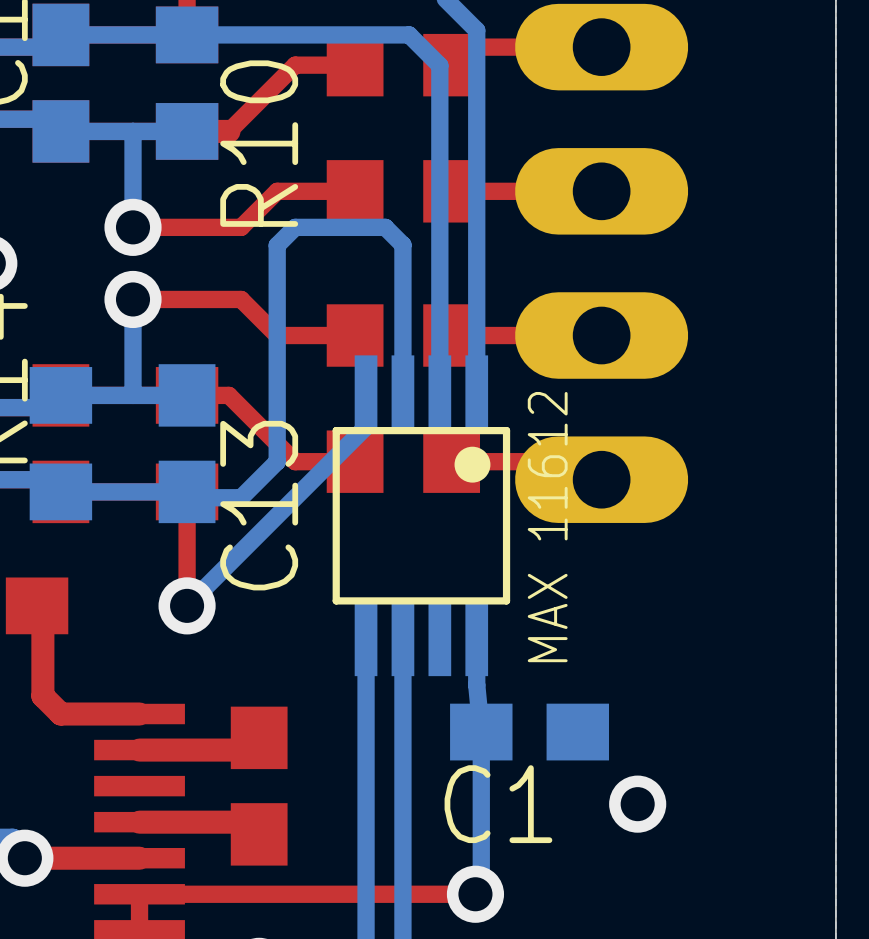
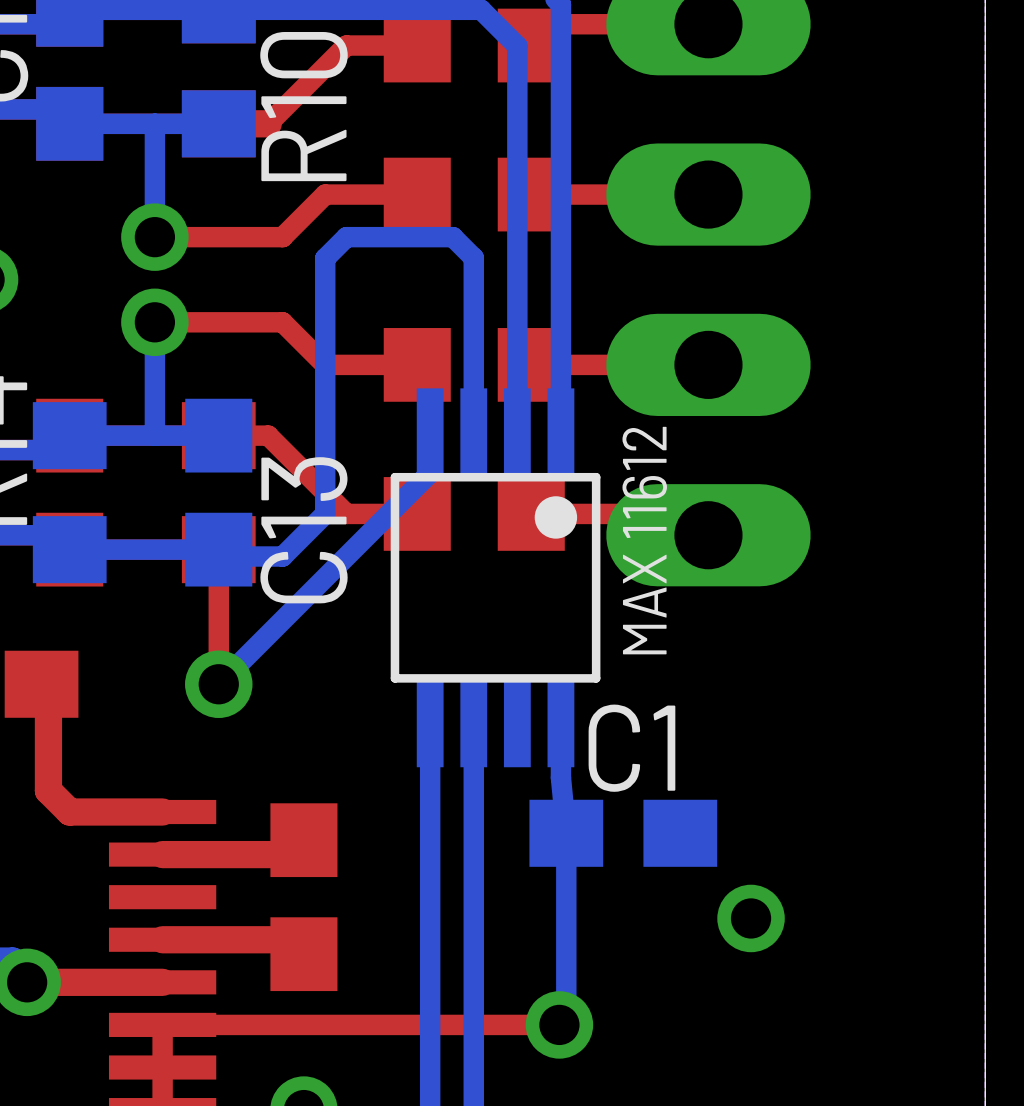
C1 name position: C1 (498, 804) -> C1 (631, 748)

